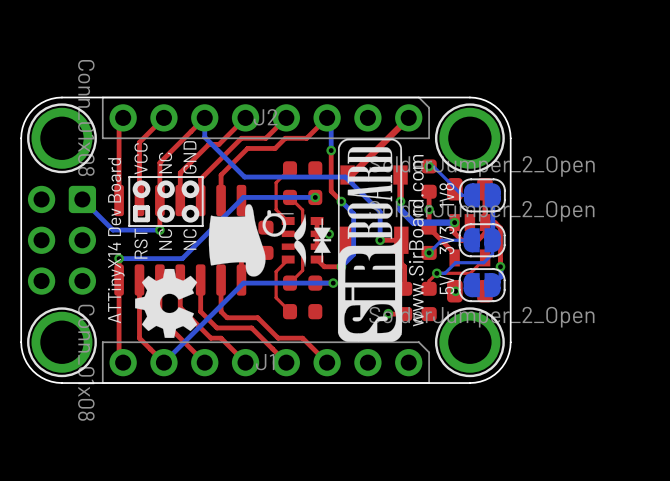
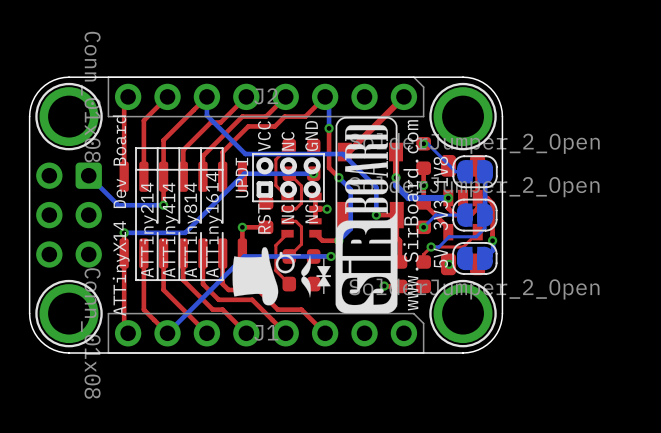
text position: GND (189, 157) -> GND (311, 136)
text position: VCC (141, 158) -> VCC (264, 136)
text: NC (165, 162) -> none
text: none -> NC (288, 141)
line: none -> (157, 148) (157, 222)
line: none -> (179, 148) (179, 222)
line: none -> (201, 148) (201, 222)
line: (202, 177) (129, 177) (129, 225) (202, 225) (202, 177) -> (323, 154) (253, 154) (253, 201) (323, 201) (323, 154)
drawing: [132, 180, 332, 338] -> none
drawing: none -> [256, 157, 321, 199]
line: none -> (222, 169) (136, 169)
text: none -> UPDI (242, 177)
line: (147, 207) (147, 219) (135, 219) (135, 207) (147, 207) -> (270, 183) (270, 195) (258, 195) (258, 183) (270, 183)
text: NC (165, 239) -> none
text: NC (190, 239) -> none
text: none -> NC (288, 213)
text: none -> NC (311, 213)
text position: RST (141, 243) -> RST (264, 218)
line: none -> (222, 222) (222, 148) (136, 148) (136, 280) (222, 280) (222, 232)
line: none -> (157, 232) (157, 280)
line: none -> (179, 232) (179, 280)
line: none -> (201, 232) (201, 280)
text: none -> ATTiny1614 (213, 224)
text: none -> ATTiny414 (170, 230)
text: none -> ATTiny214 (148, 230)
text: none -> ATTiny814 (192, 230)
drawing: none -> [232, 247, 331, 306]

